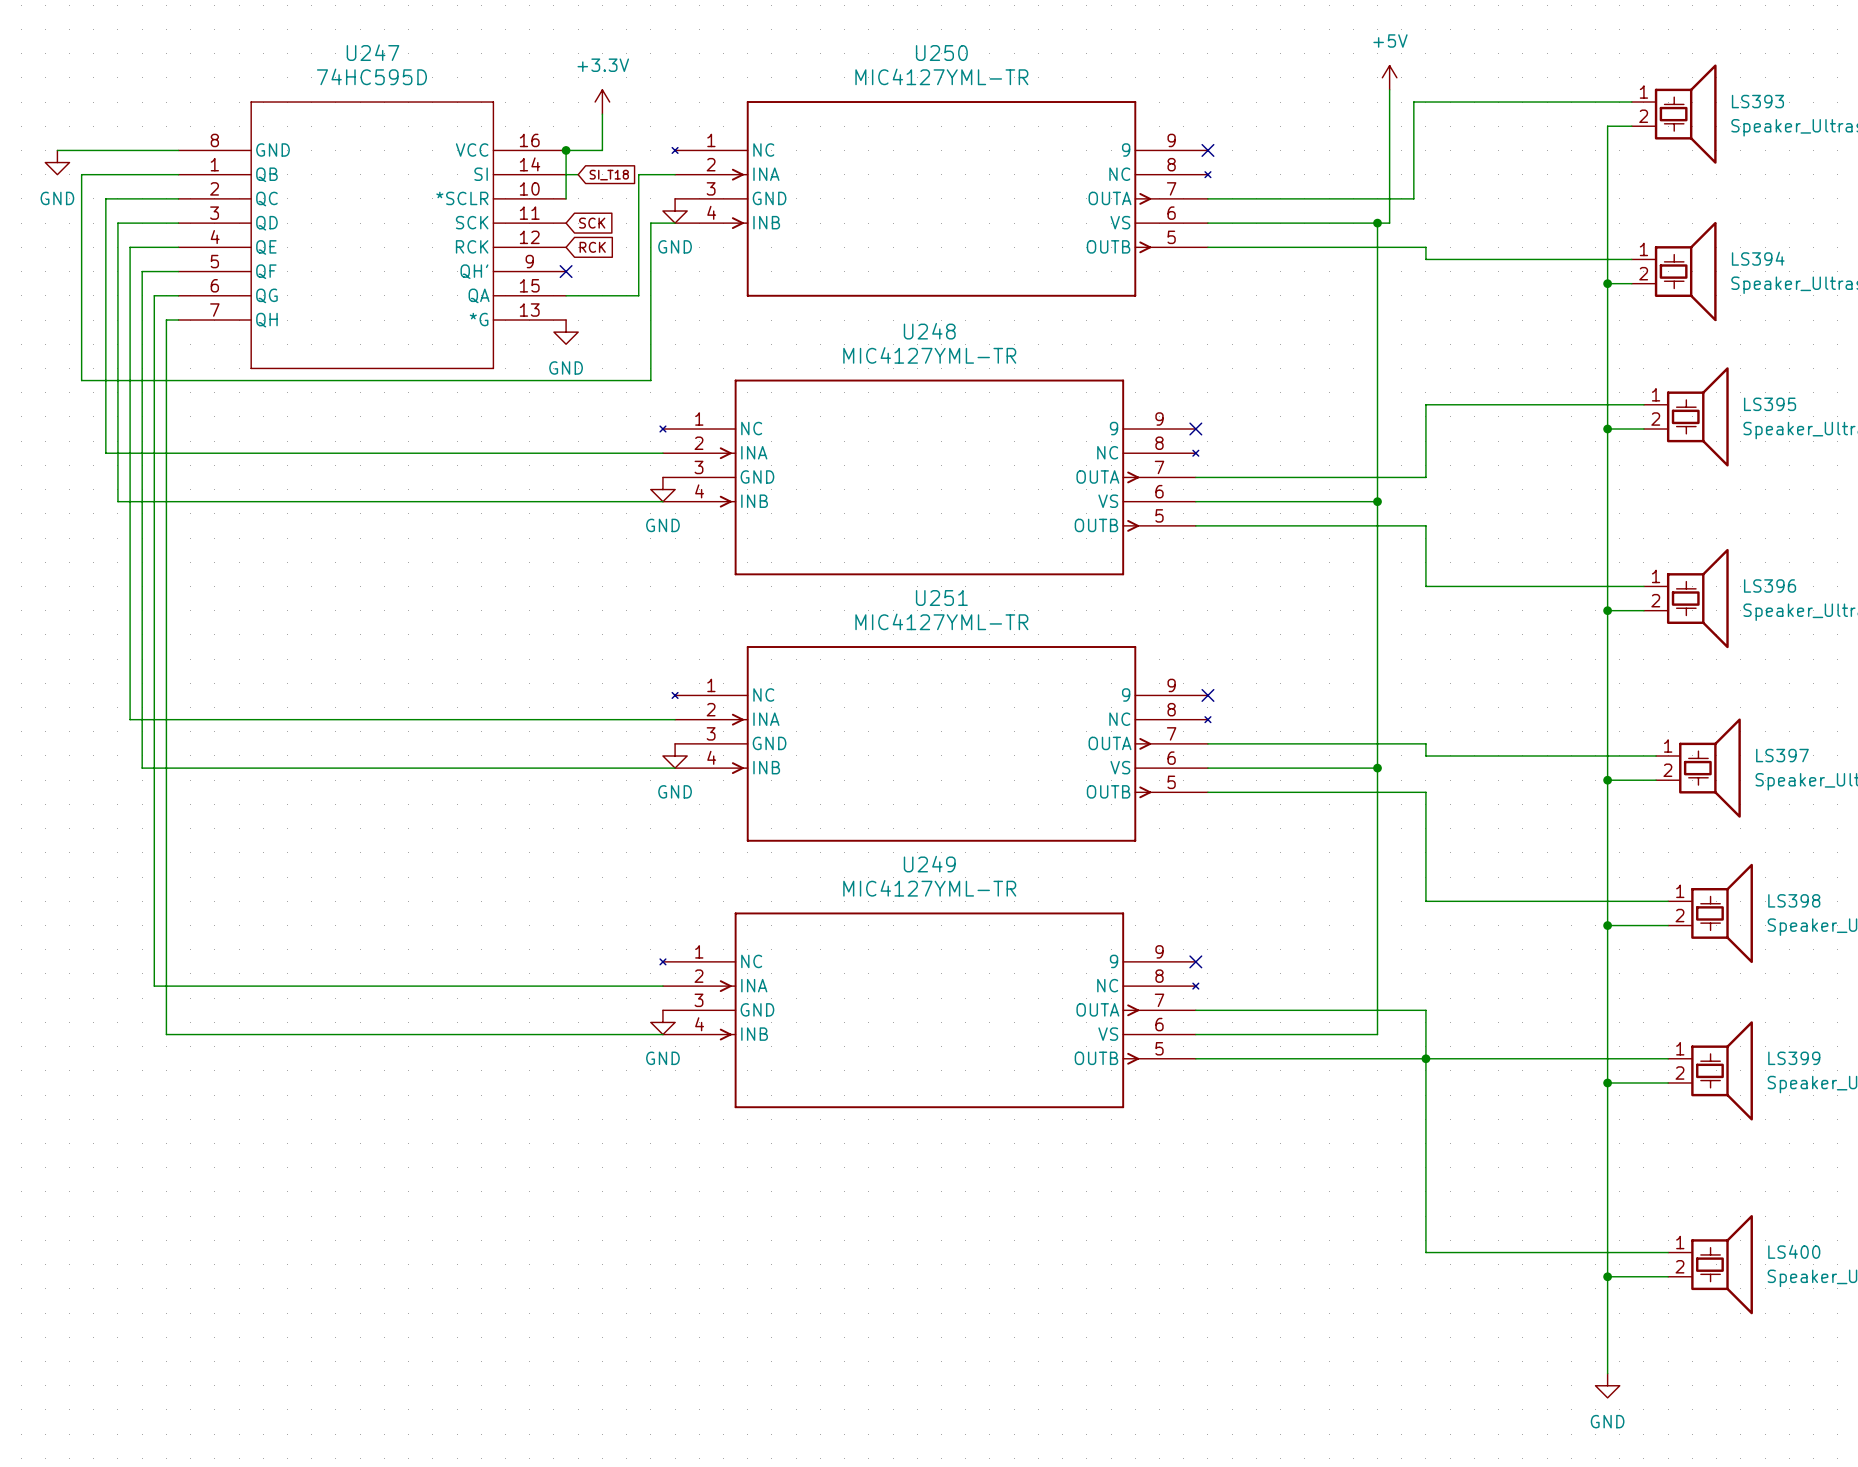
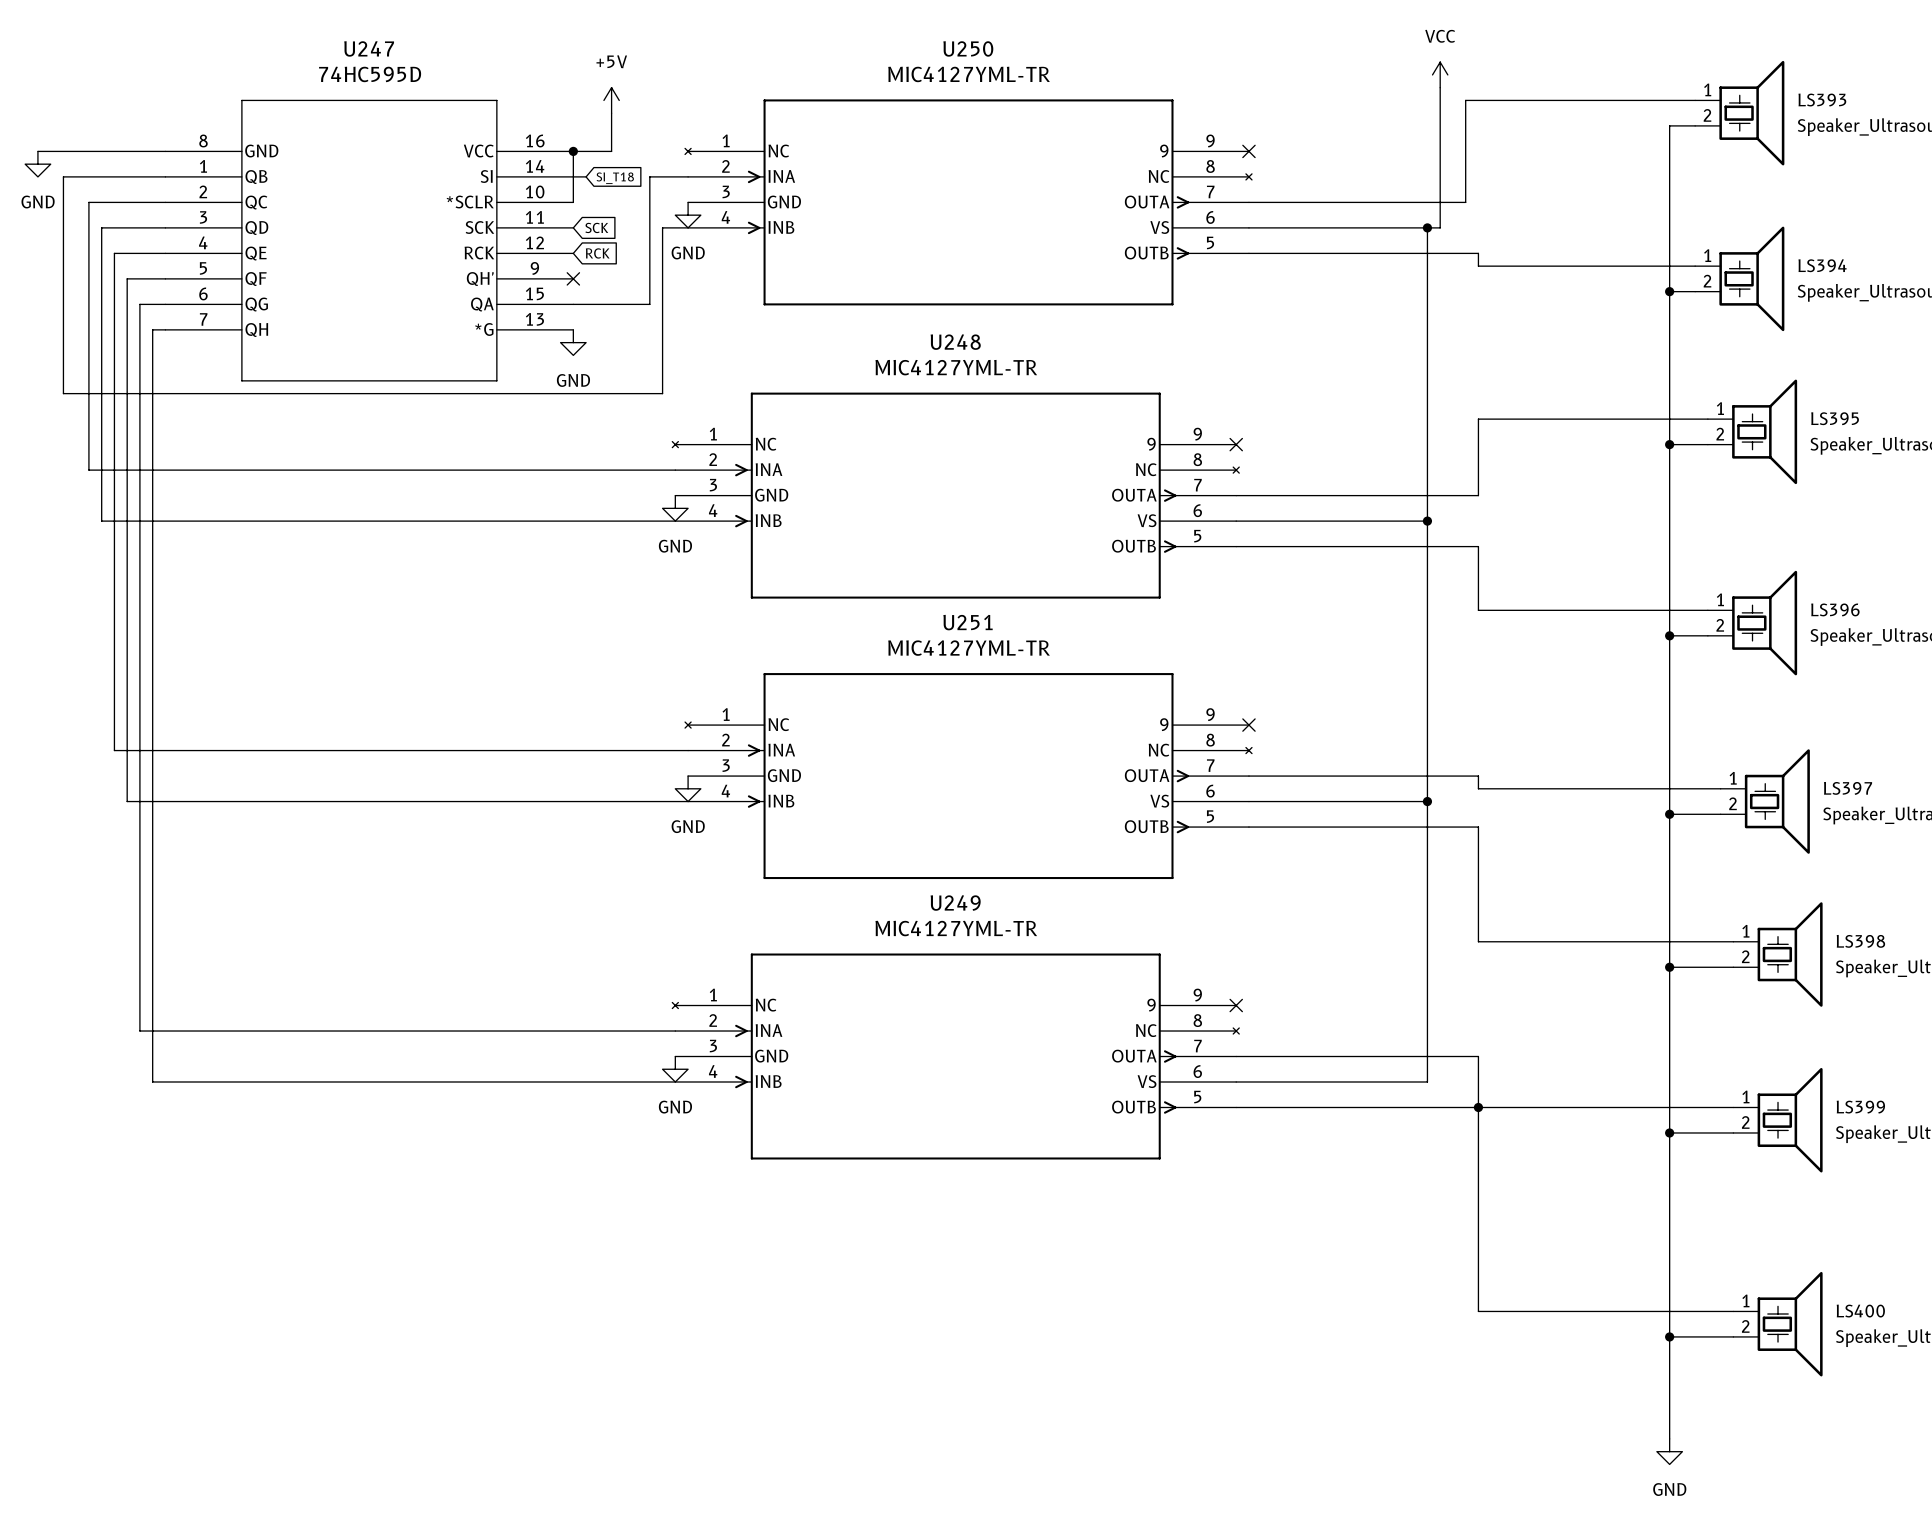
power symbol: +5V (1389, 77) -> VCC (1440, 74)
power symbol: +3.3V (602, 102) -> +5V (611, 100)

